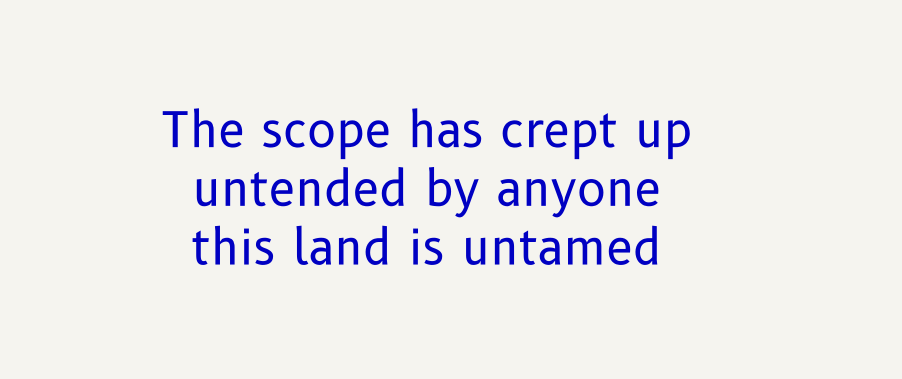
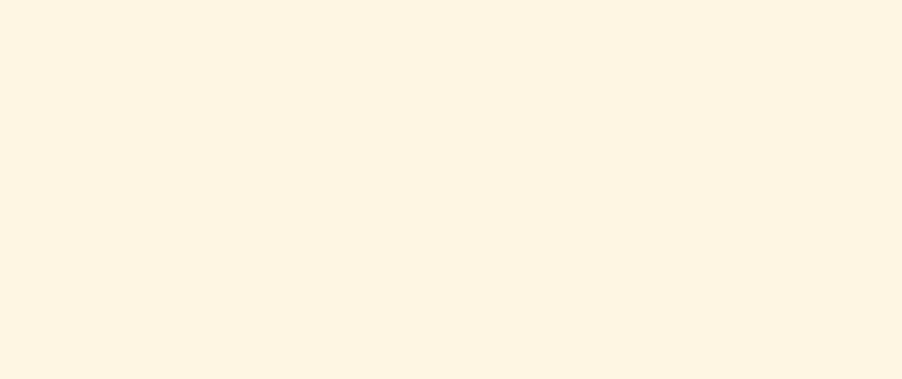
text: The scope has crept up (426, 133) -> none
text: untended by anyone (427, 192) -> none
text: this land is untamed (424, 245) -> none

